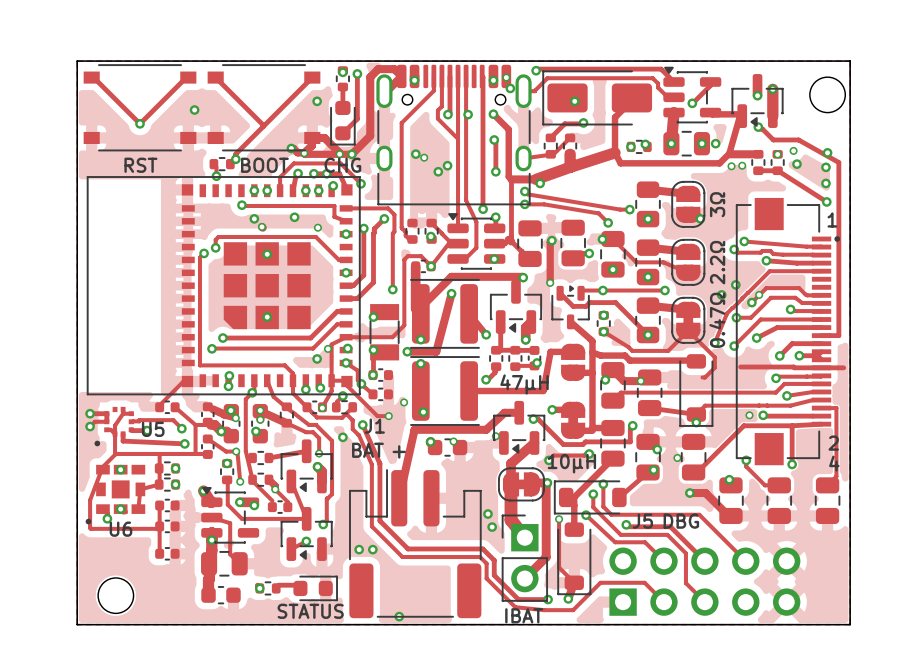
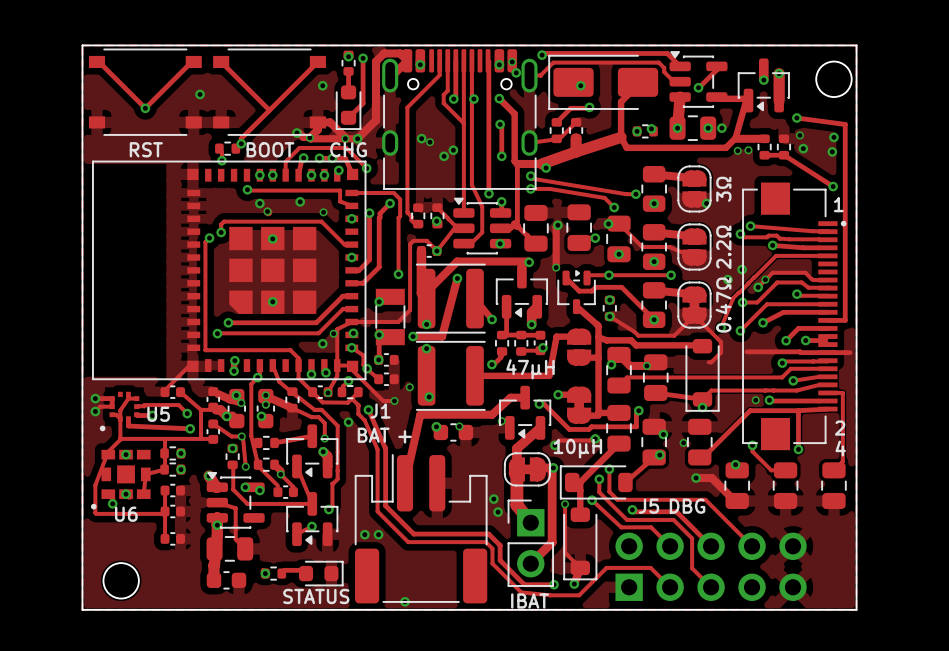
track: (758, 127) (773, 139) (798, 139) (838, 162) -> (796, 118) (845, 124) (845, 147)
via: (758, 127) -> none
via: none -> (796, 118)
via: (777, 154) -> none
via: (825, 183) -> none

